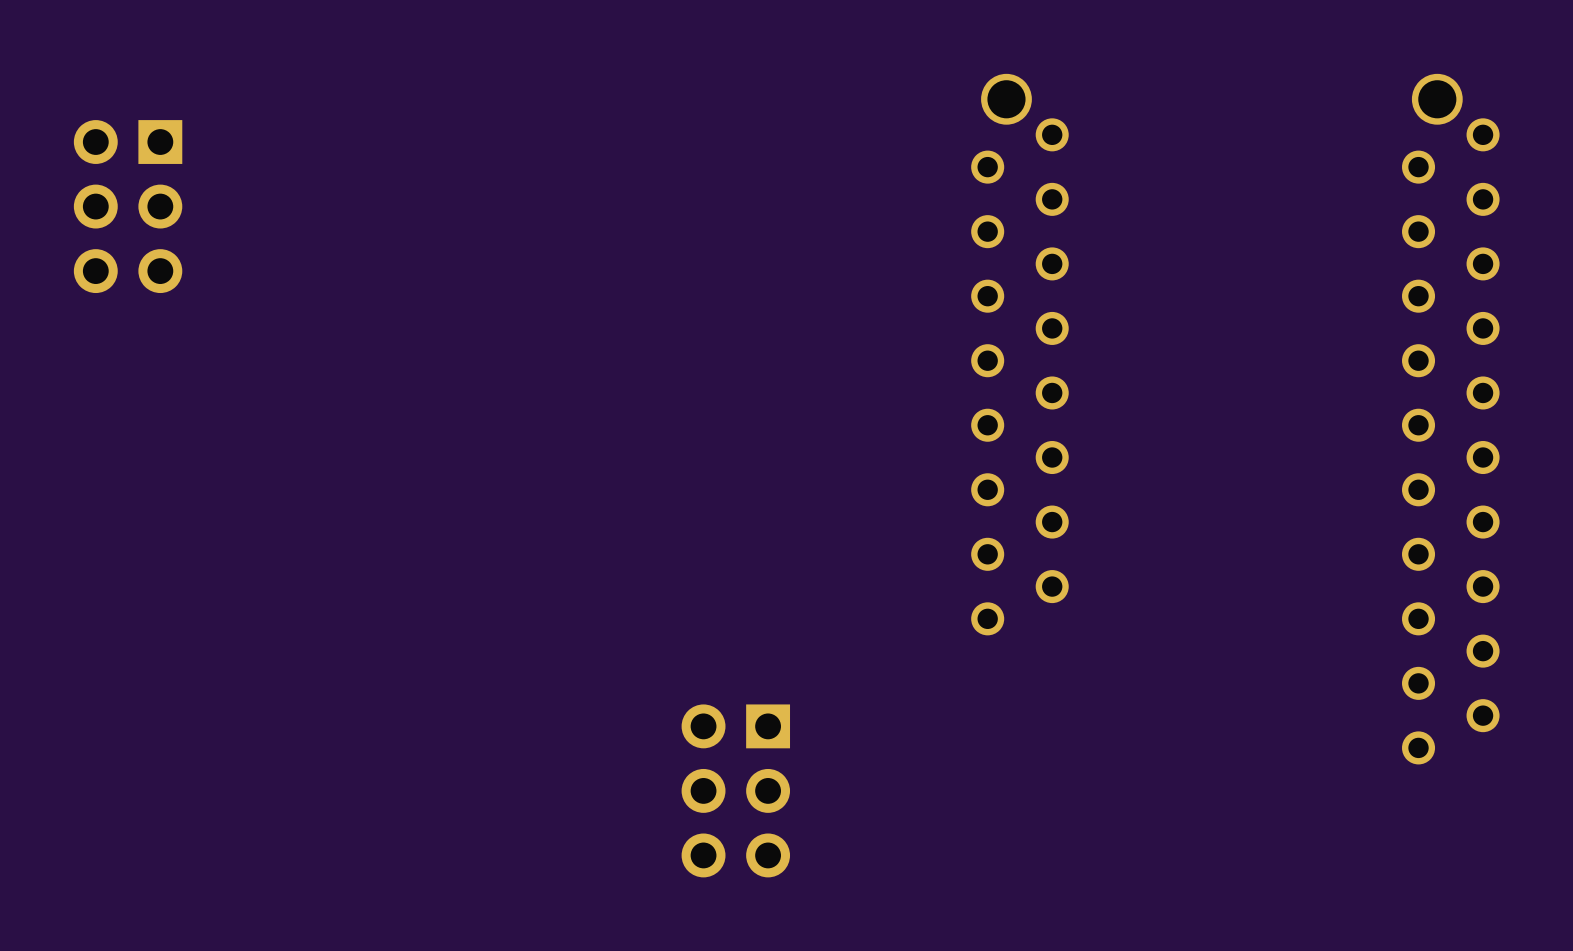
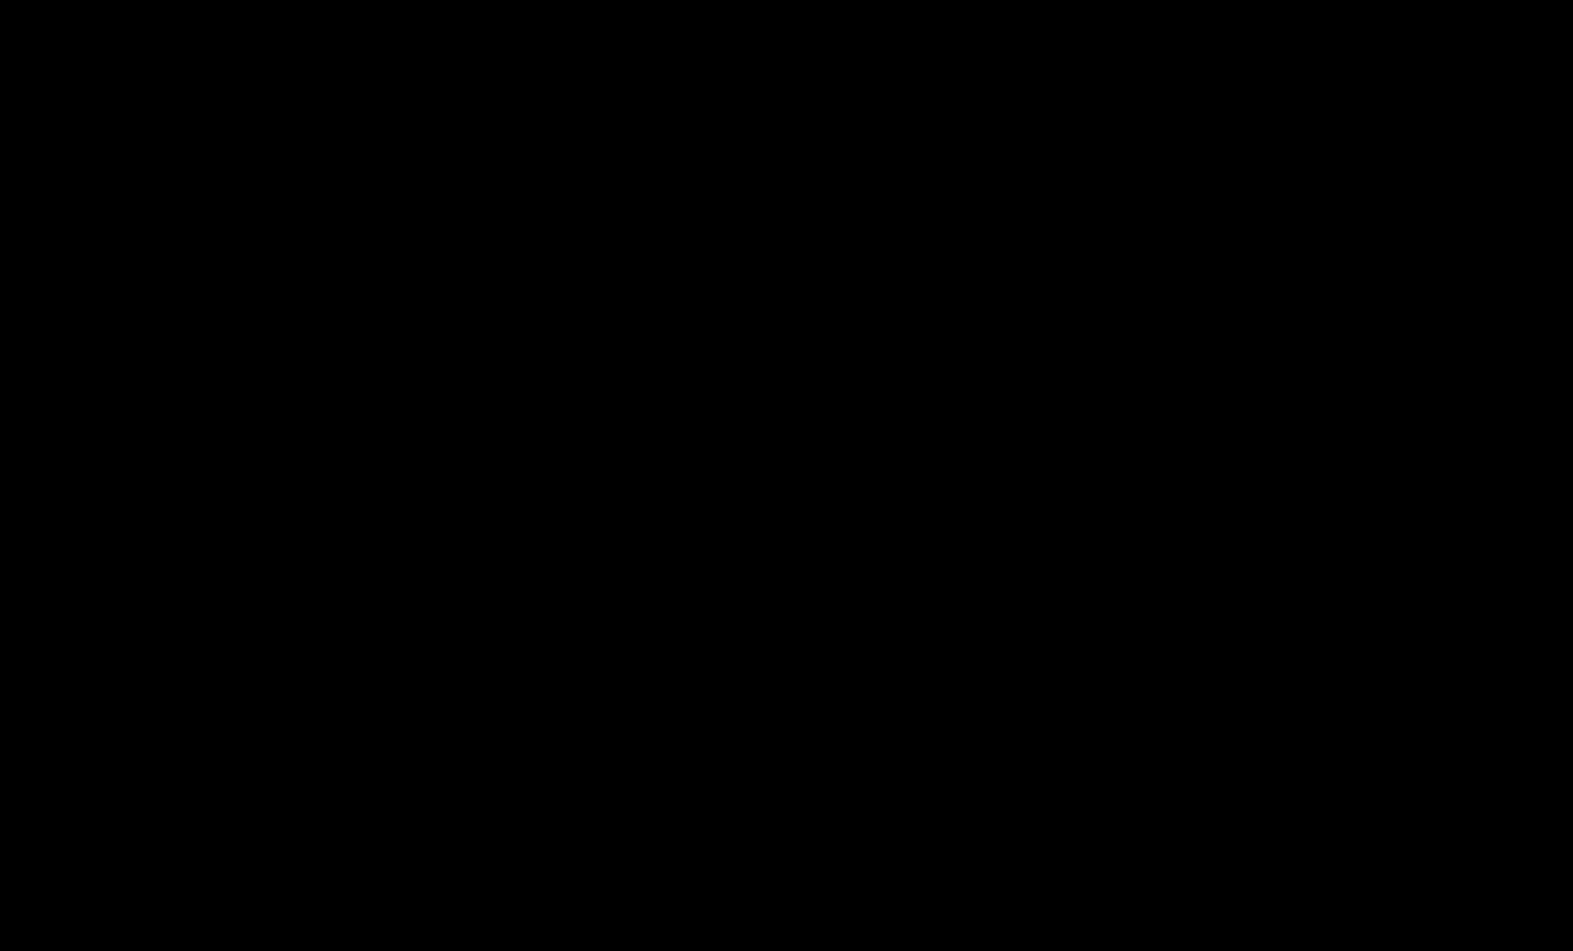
part: (128, 206) -> none
part: (1019, 354) -> none
part: (1450, 419) -> none
part: (735, 790) -> none

